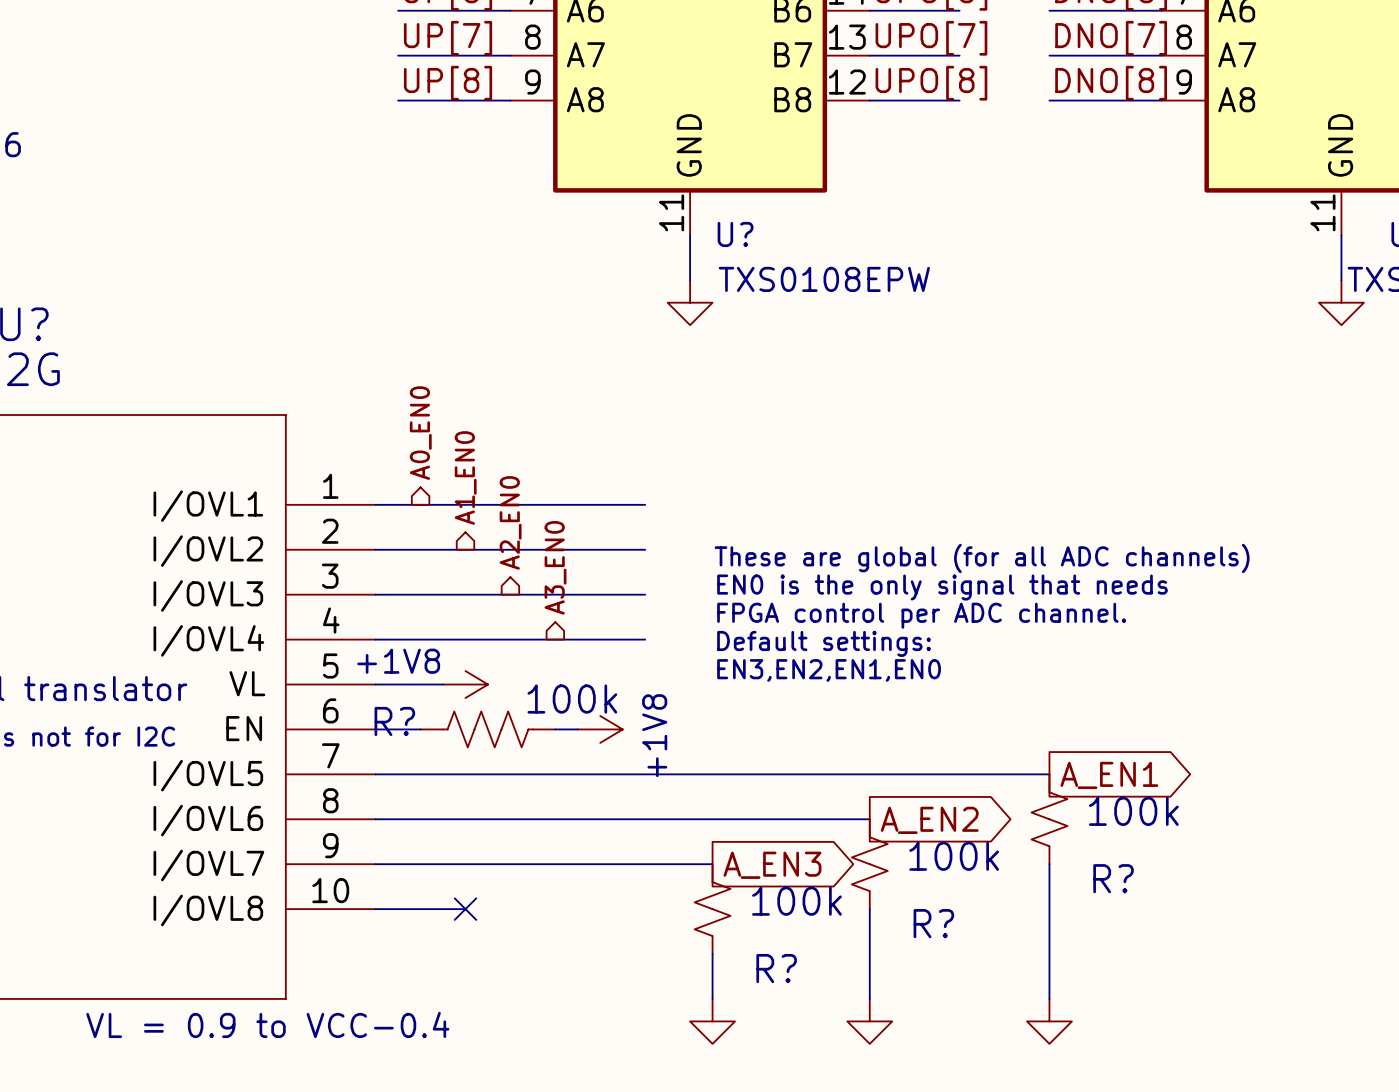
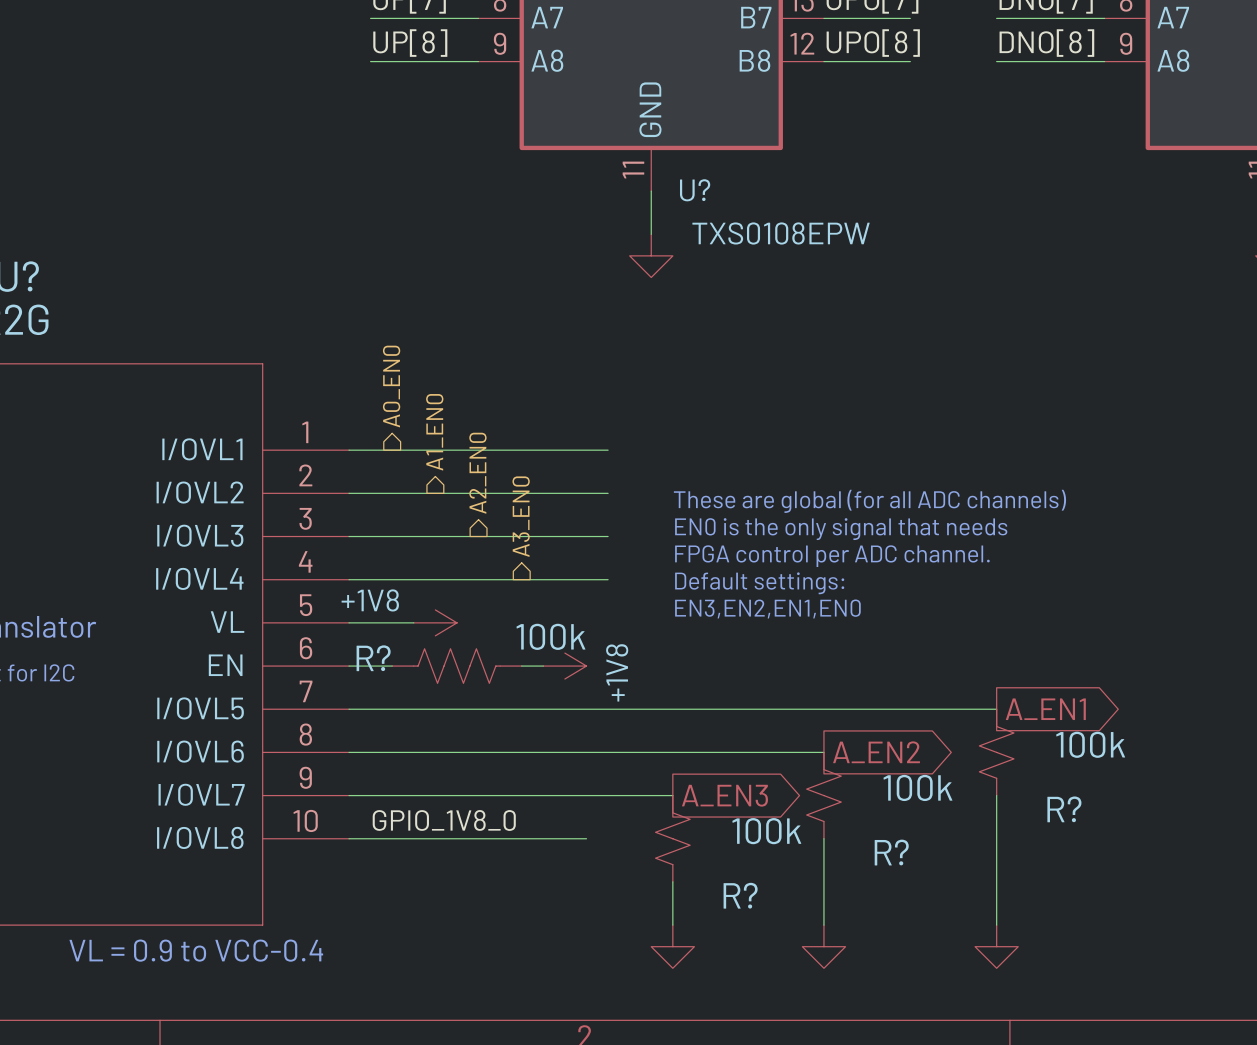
label: none -> GPIO_1V8_0 (444, 820)
wire: none -> (435, 838) (586, 838)
no-connect mark: (465, 909) -> none

